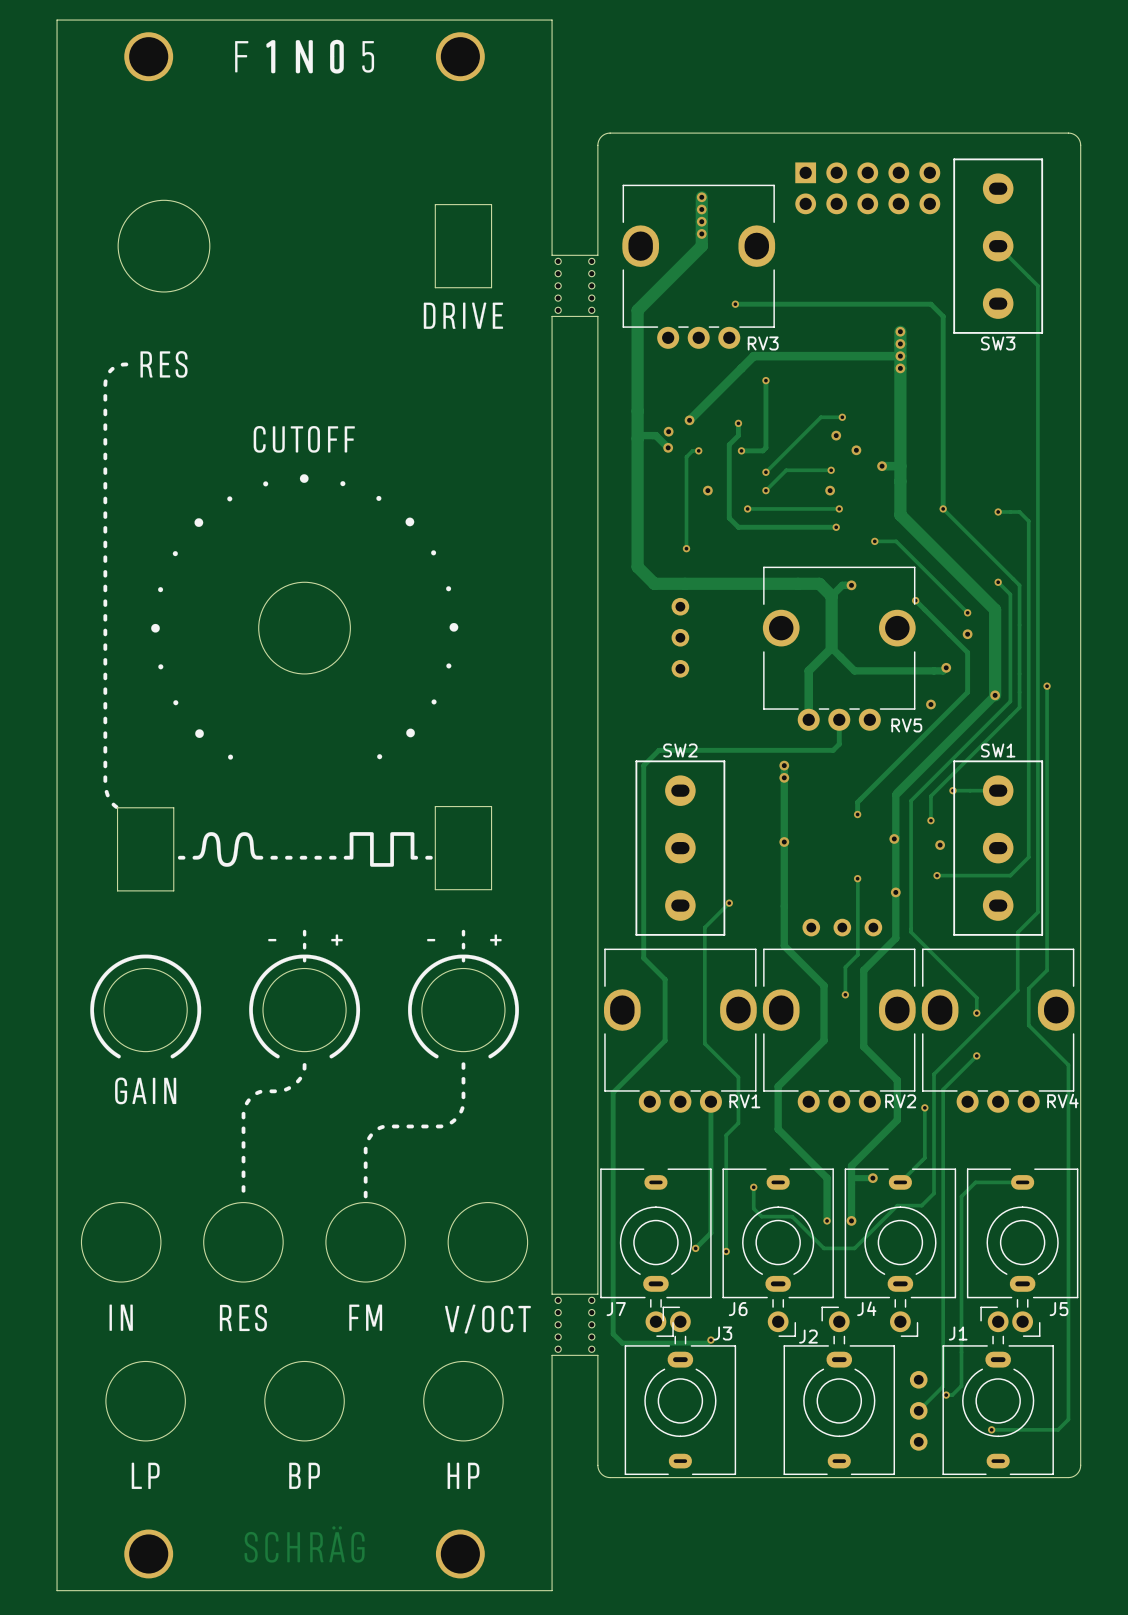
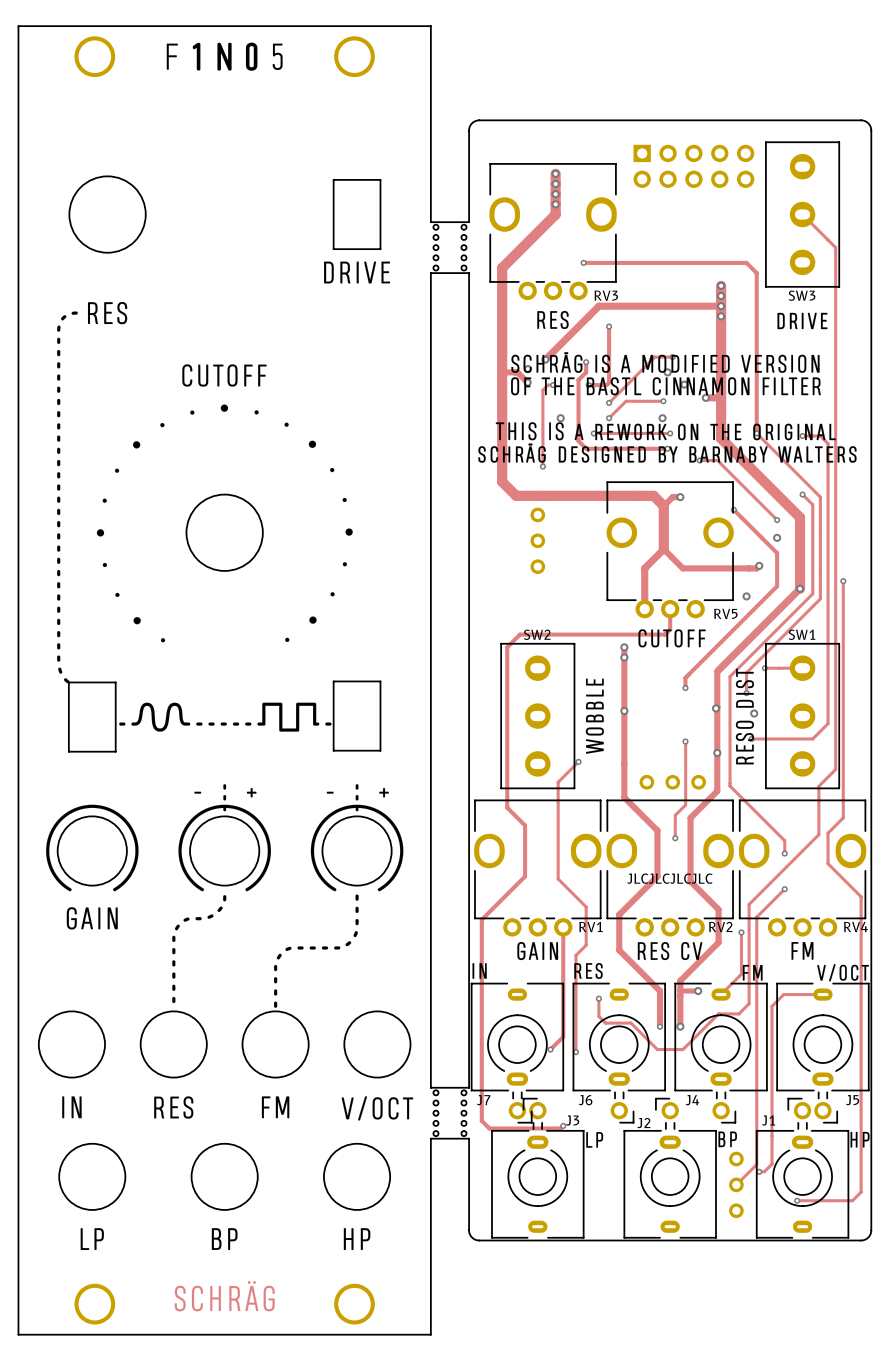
drawing: none -> [472, 310, 870, 1148]
text: none -> JLCJLCJLCJLC (669, 878)

